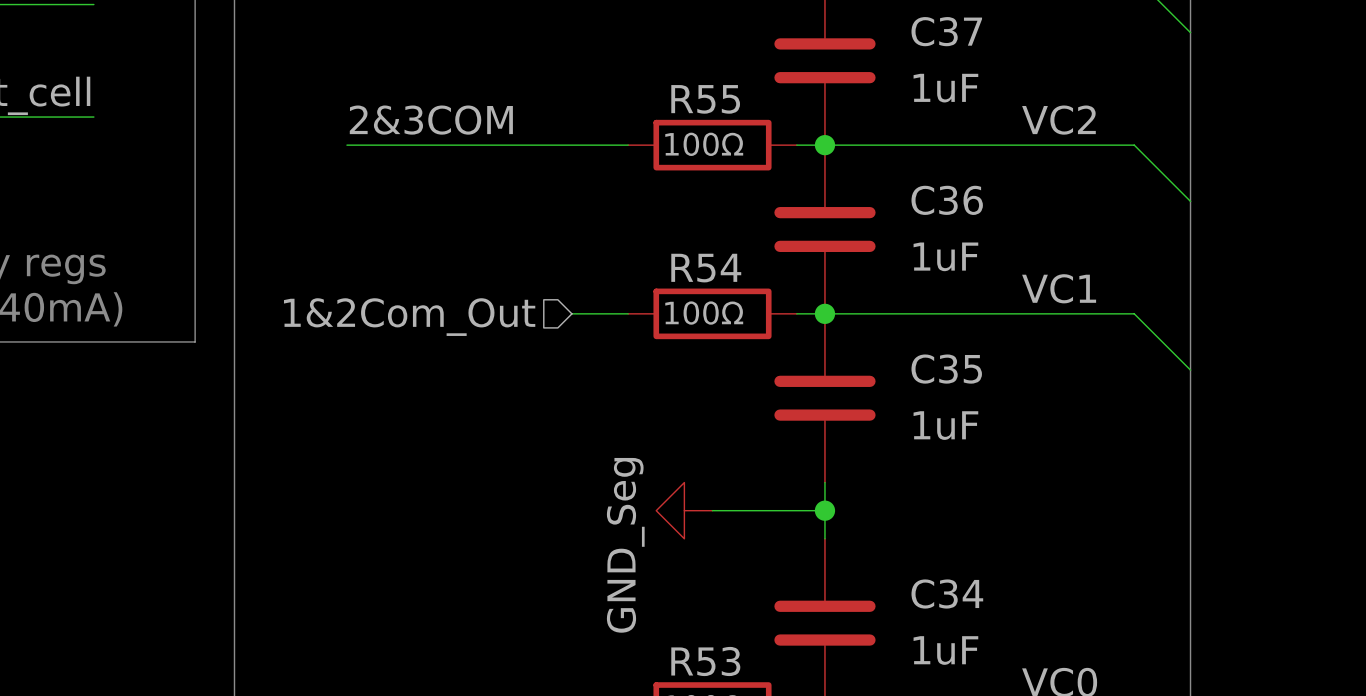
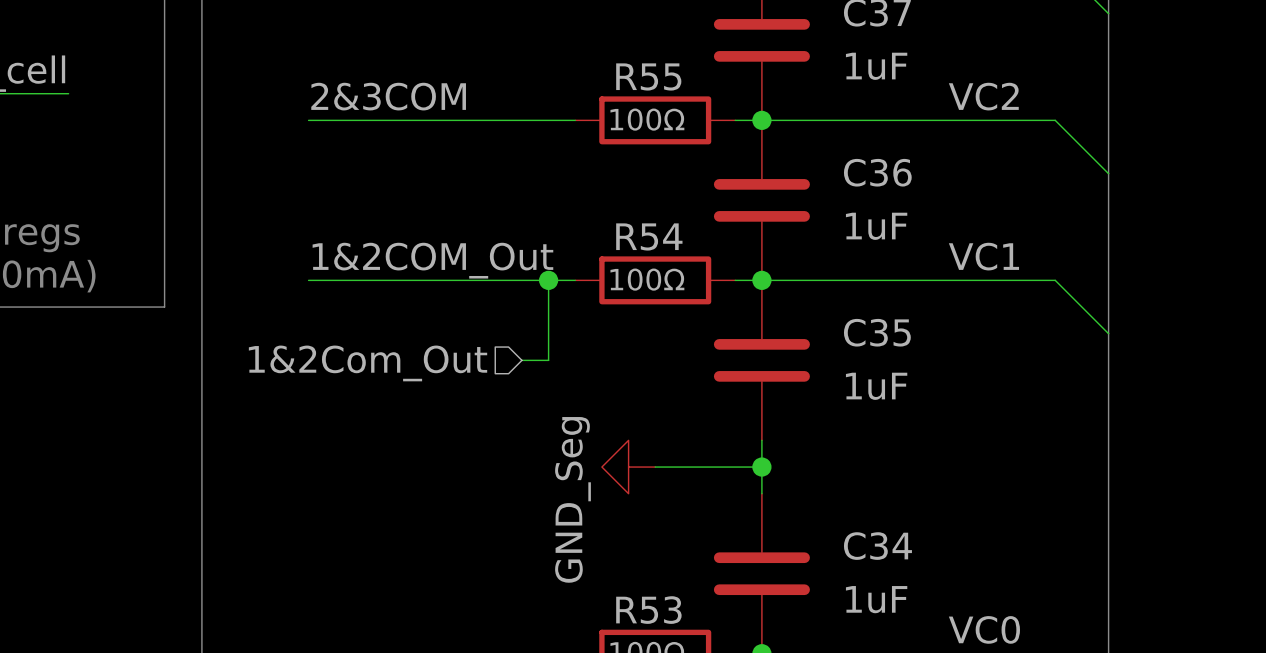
label: none -> 1&2COM_Out (432, 260)
wire: none -> (308, 280) (521, 280)
wire: none -> (548, 280) (548, 360) (521, 360)
junction: none -> (548, 280)
hierarchical label position: 1&2Com_Out (409, 317) -> 1&2Com_Out (368, 363)

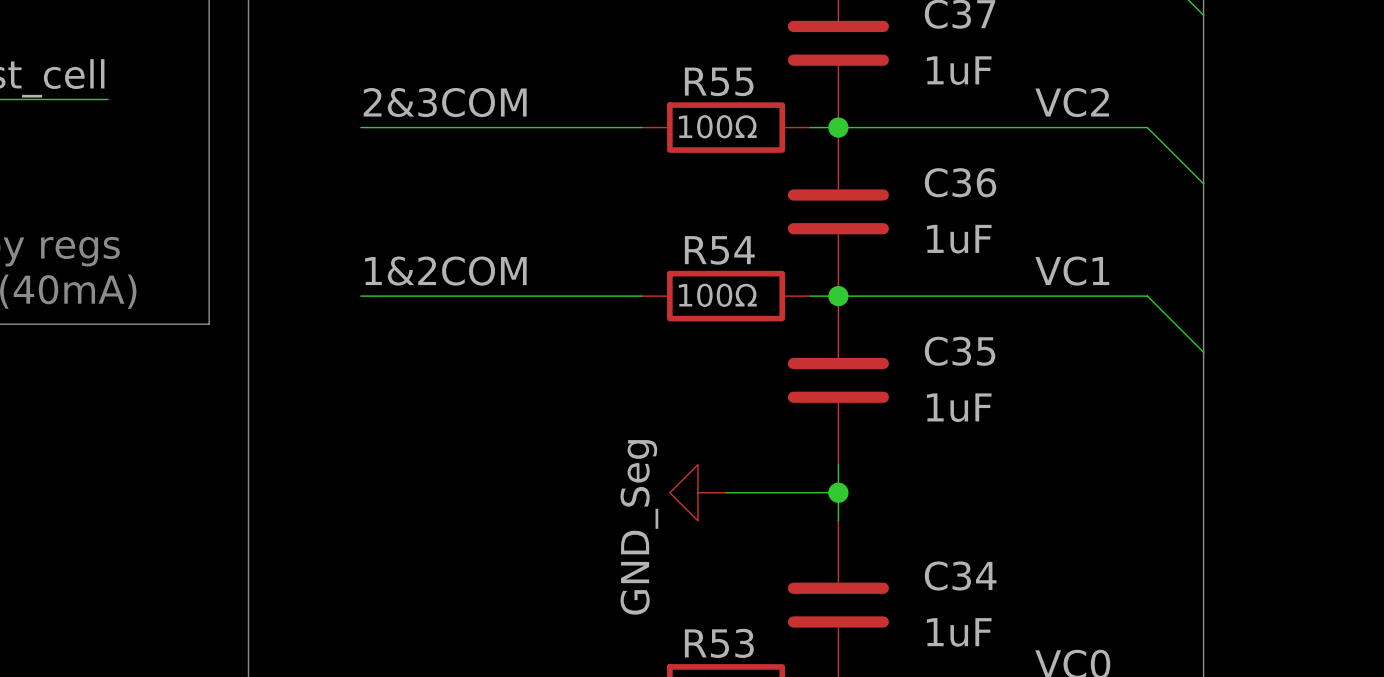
label: 1&2COM_Out (432, 260) -> 1&2COM (445, 271)
wire: (548, 280) (548, 360) (521, 360) -> none
junction: (548, 280) -> none
hierarchical label: 1&2Com_Out (368, 363) -> none

